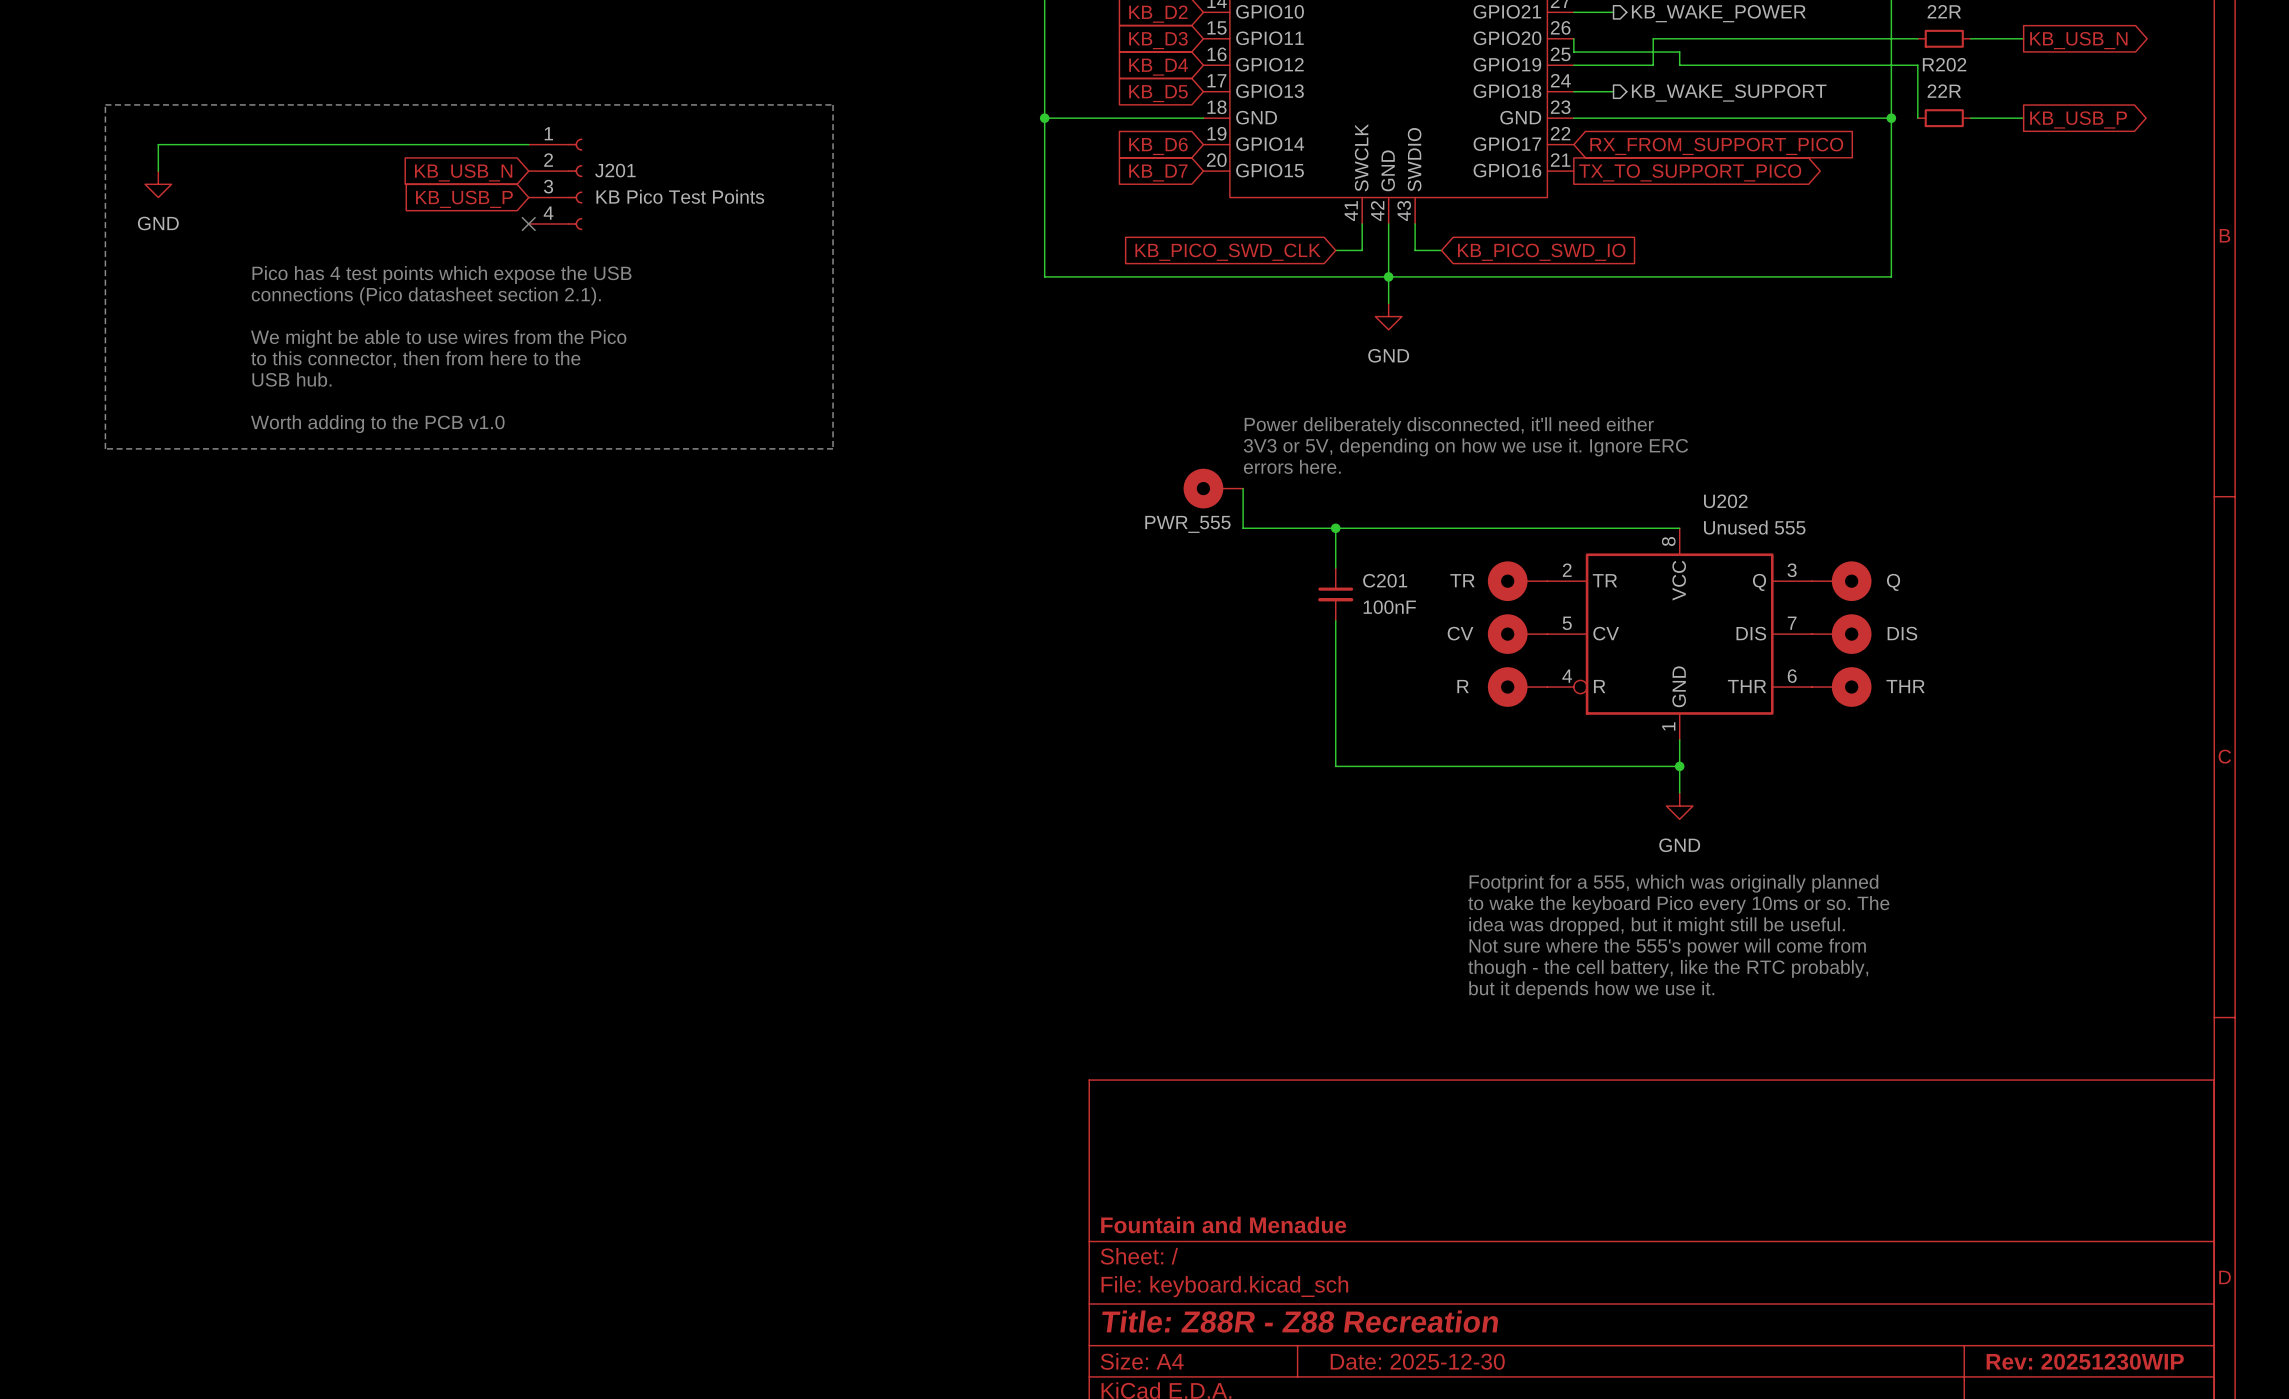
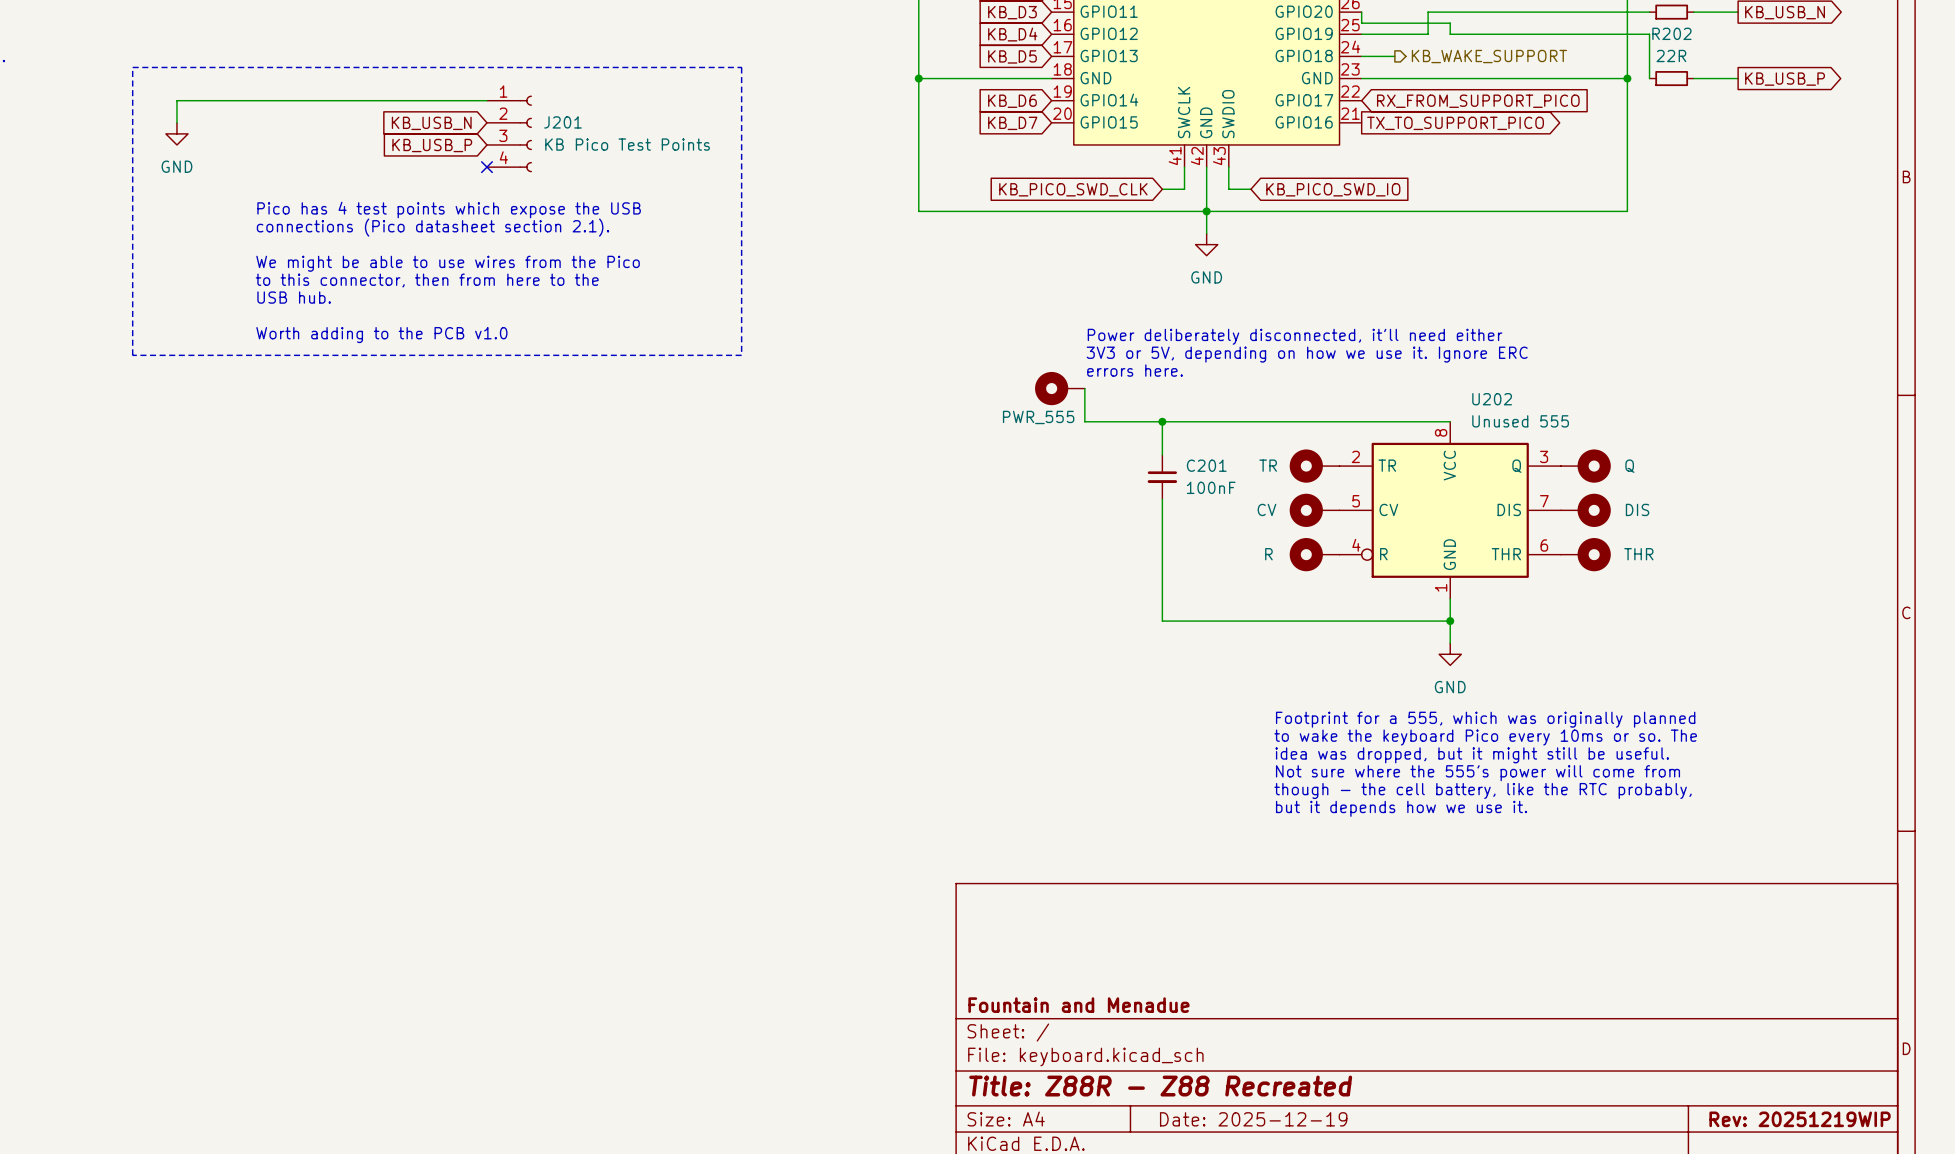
title block: Title: Z88R - Z88 Recreation (1300, 1321) -> Title: Z88R - Z88 Recreated (1160, 1086)
title block: Date: 2025-12-30 (1417, 1361) -> Date: 2025-12-19 (1253, 1119)
title block: Rev: 20251230WIP (2085, 1361) -> Rev: 20251219WIP (1800, 1119)

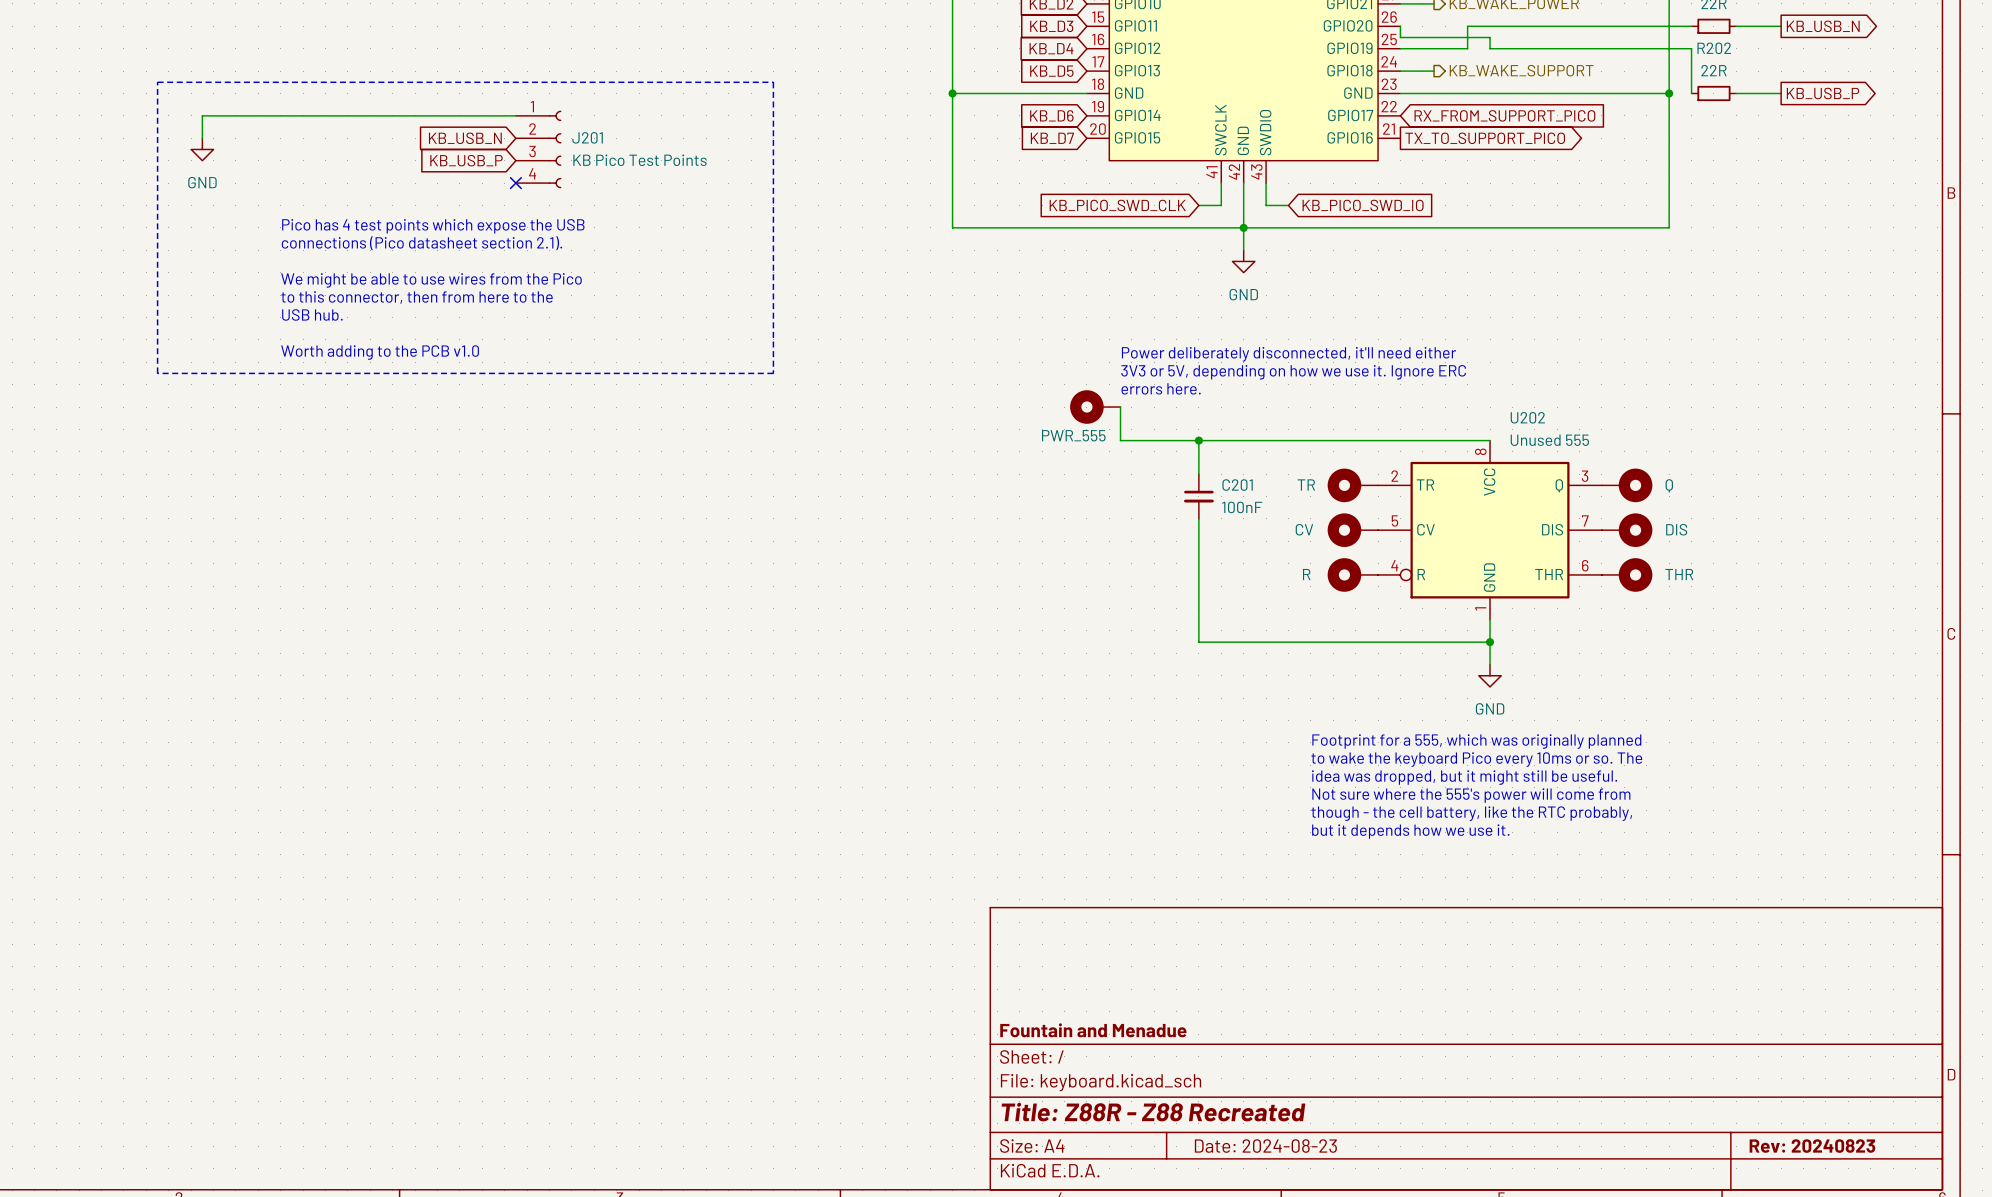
title block: Date: 2025-12-19 (1253, 1119) -> Date: 2024-08-23 (1265, 1146)
title block: Rev: 20251219WIP (1800, 1119) -> Rev: 20240823 (1812, 1146)

